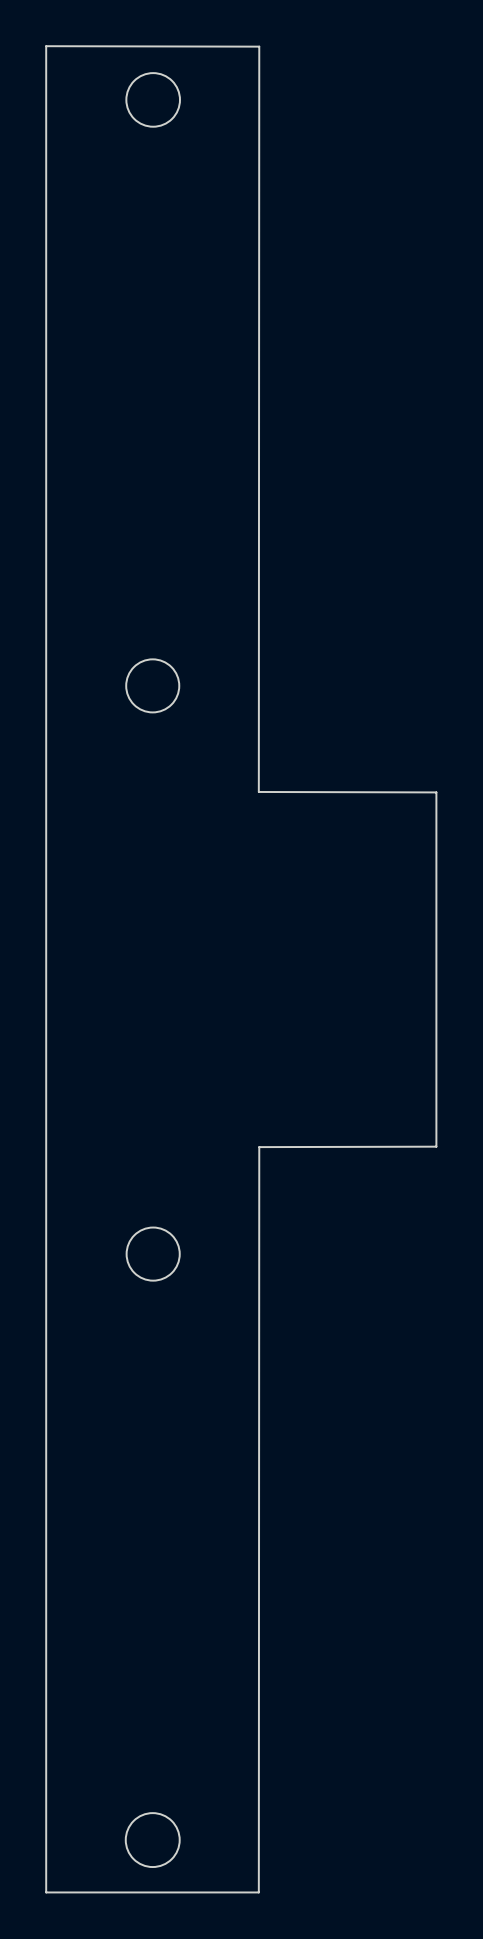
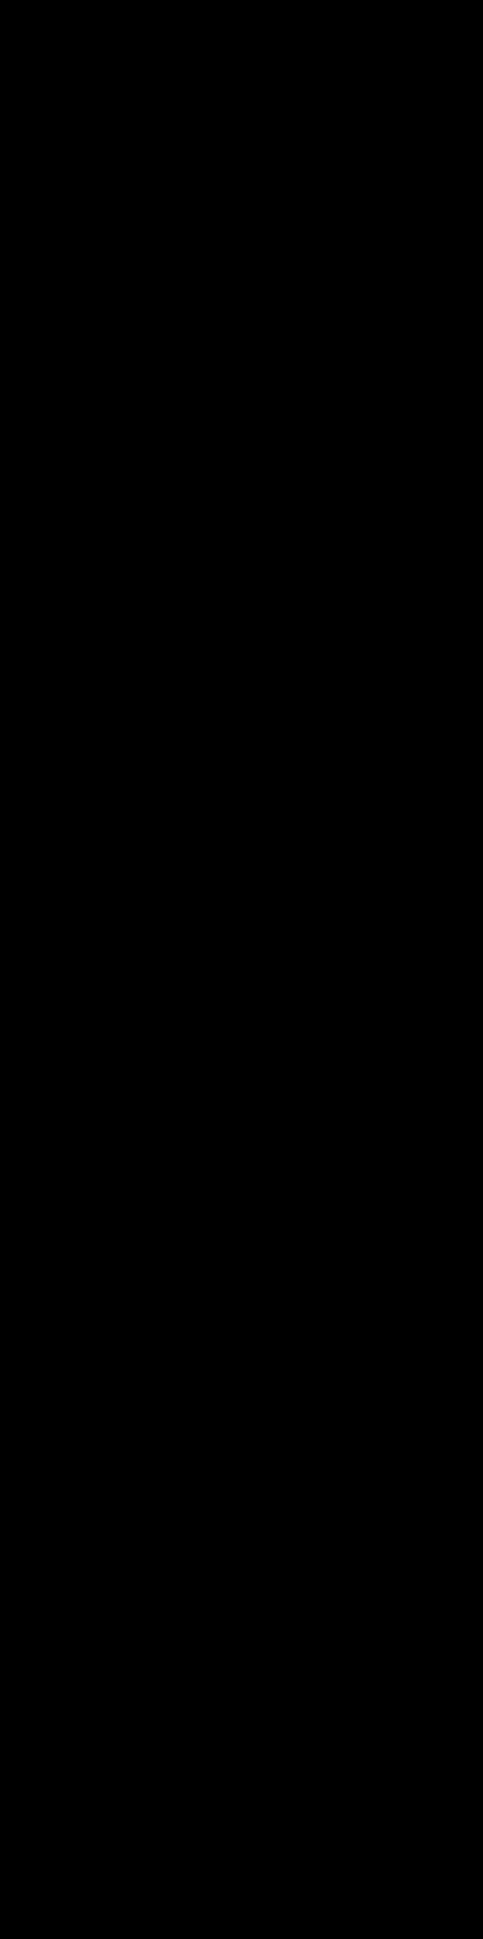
board edge: (46, 46) (259, 46) (258, 791) (436, 792) (436, 1146) (259, 1147) (258, 1892) (46, 1892) (46, 46) -> none
round board edge: [125, 72, 181, 128] -> none
round board edge: [125, 658, 181, 714] -> none
round board edge: [125, 1226, 181, 1282] -> none
round board edge: [124, 1812, 181, 1868] -> none

